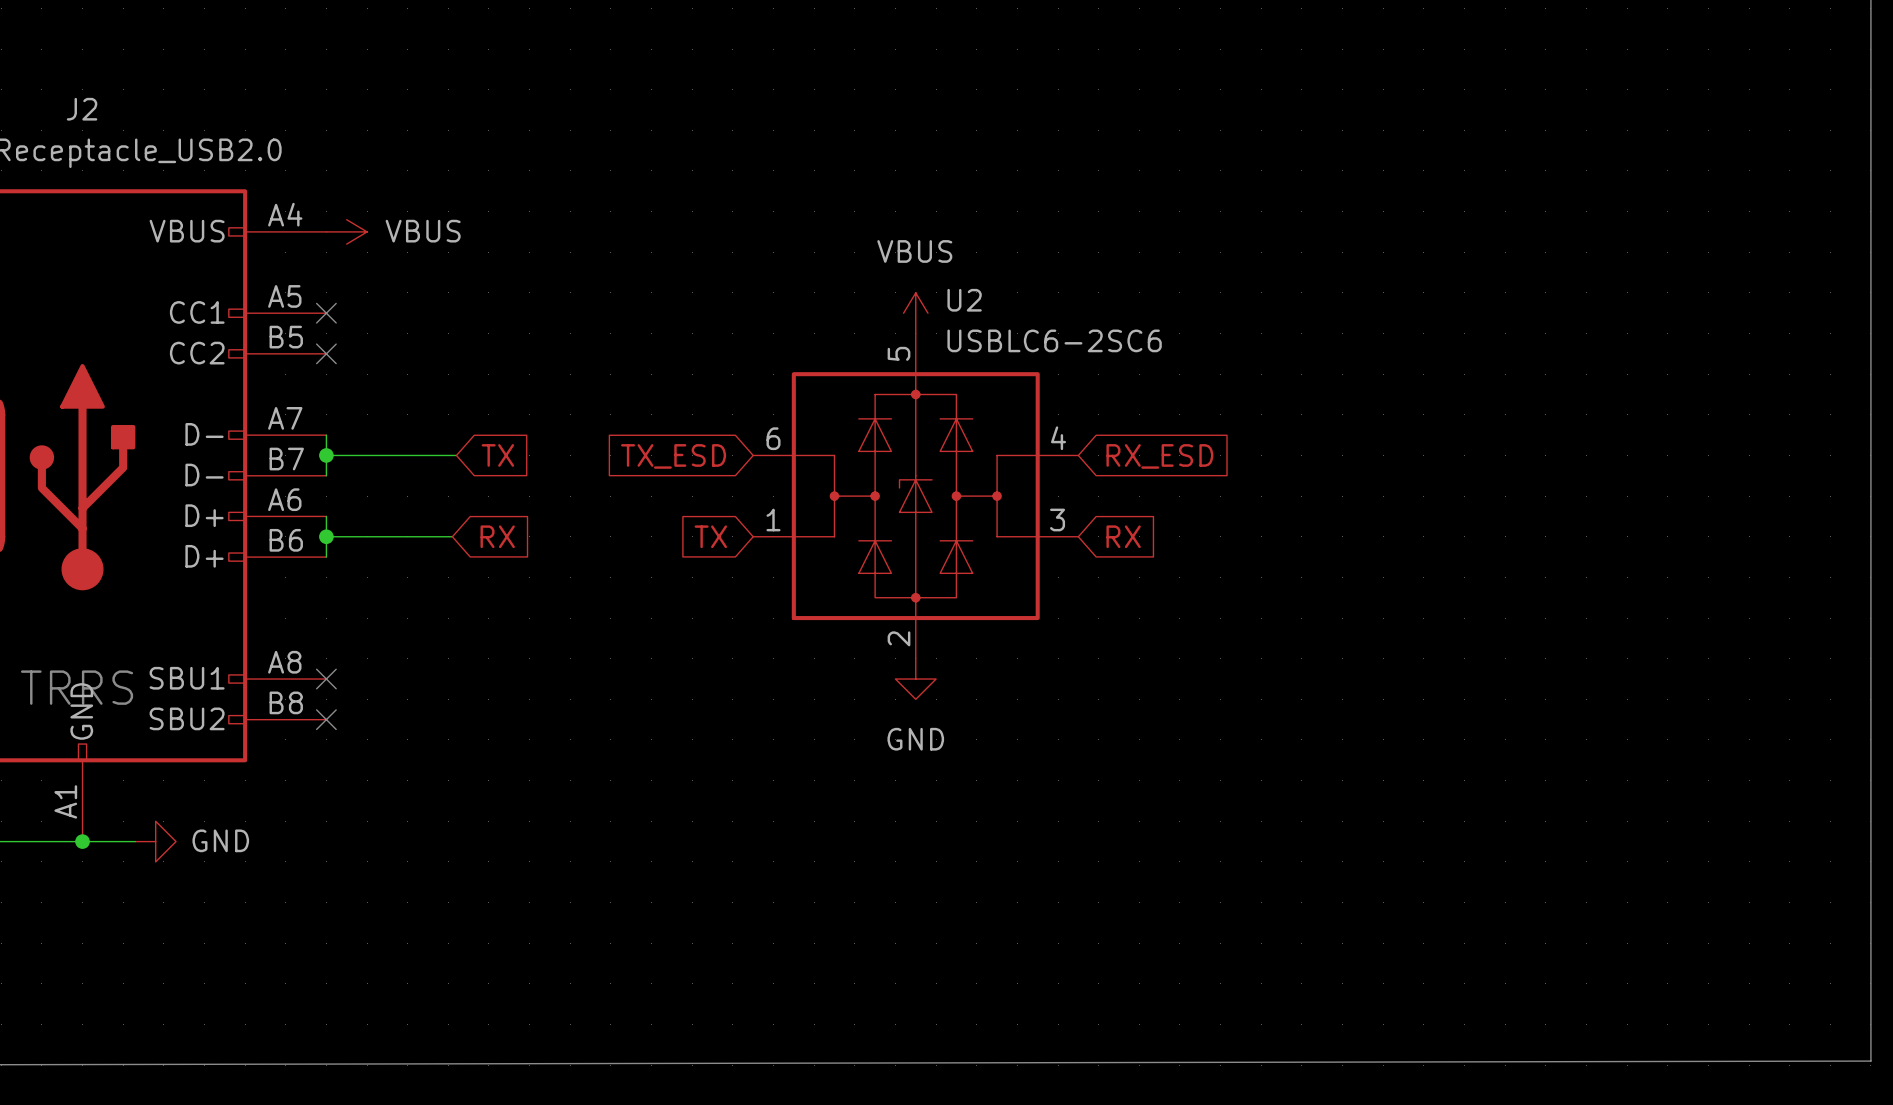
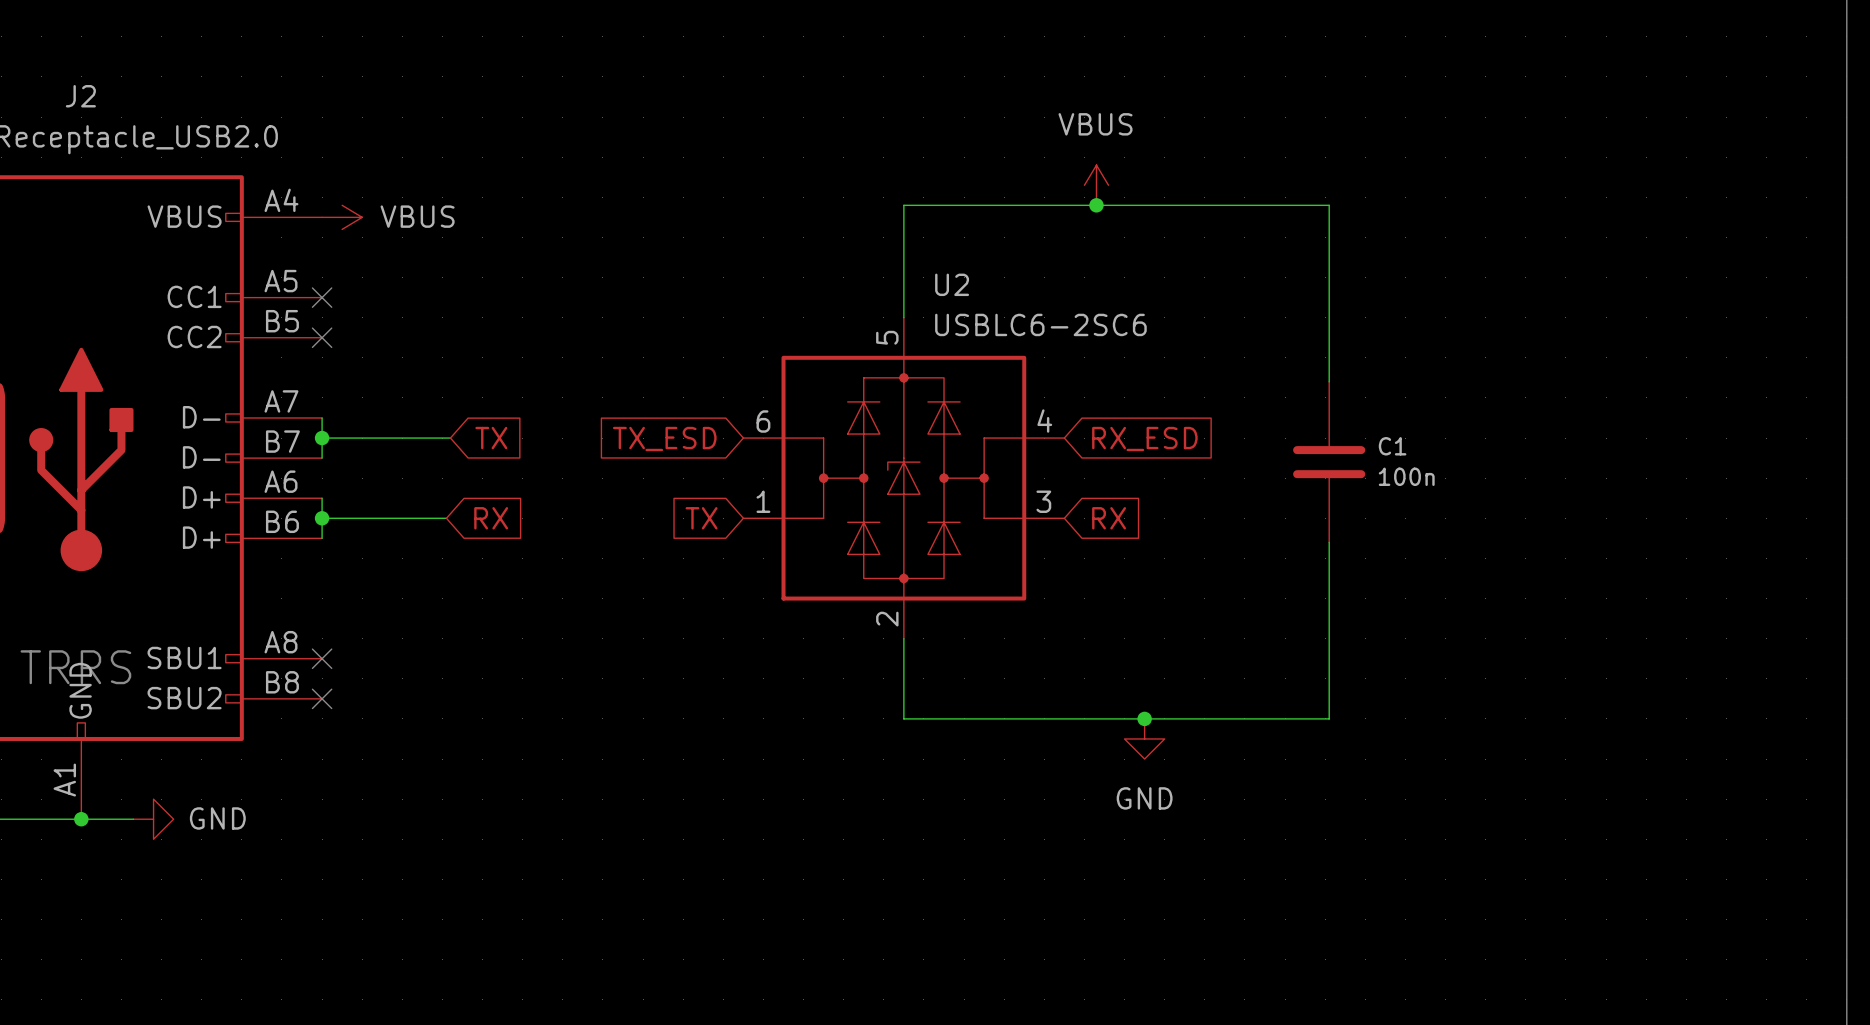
junction: none -> (1096, 205)
power symbol position: VBUS (915, 313) -> VBUS (1096, 185)
wire: none -> (903, 317) (903, 205) (1329, 205) (1329, 381)
C1: none -> 100n (1329, 462)
wire: none -> (1329, 542) (1329, 718) (903, 718) (903, 638)
power symbol position: GND (915, 679) -> GND (1144, 738)
junction: none -> (1144, 718)

